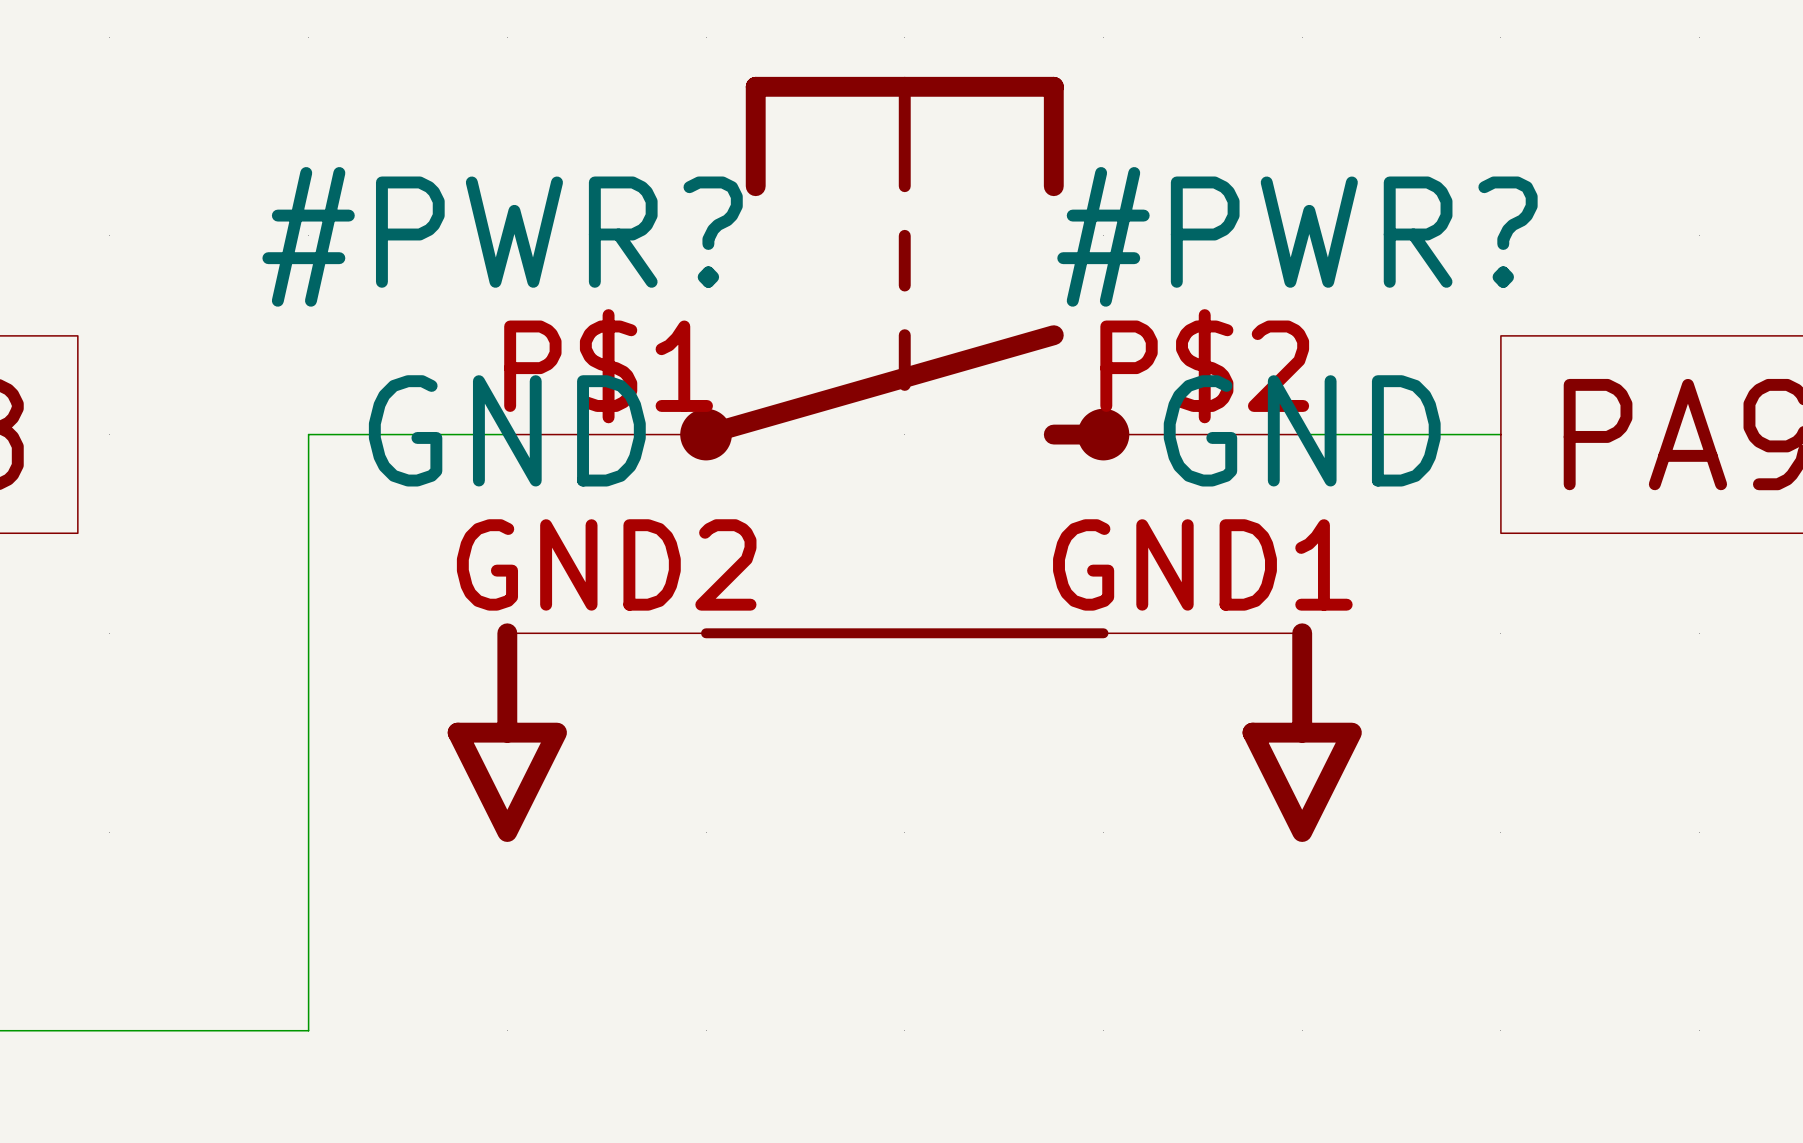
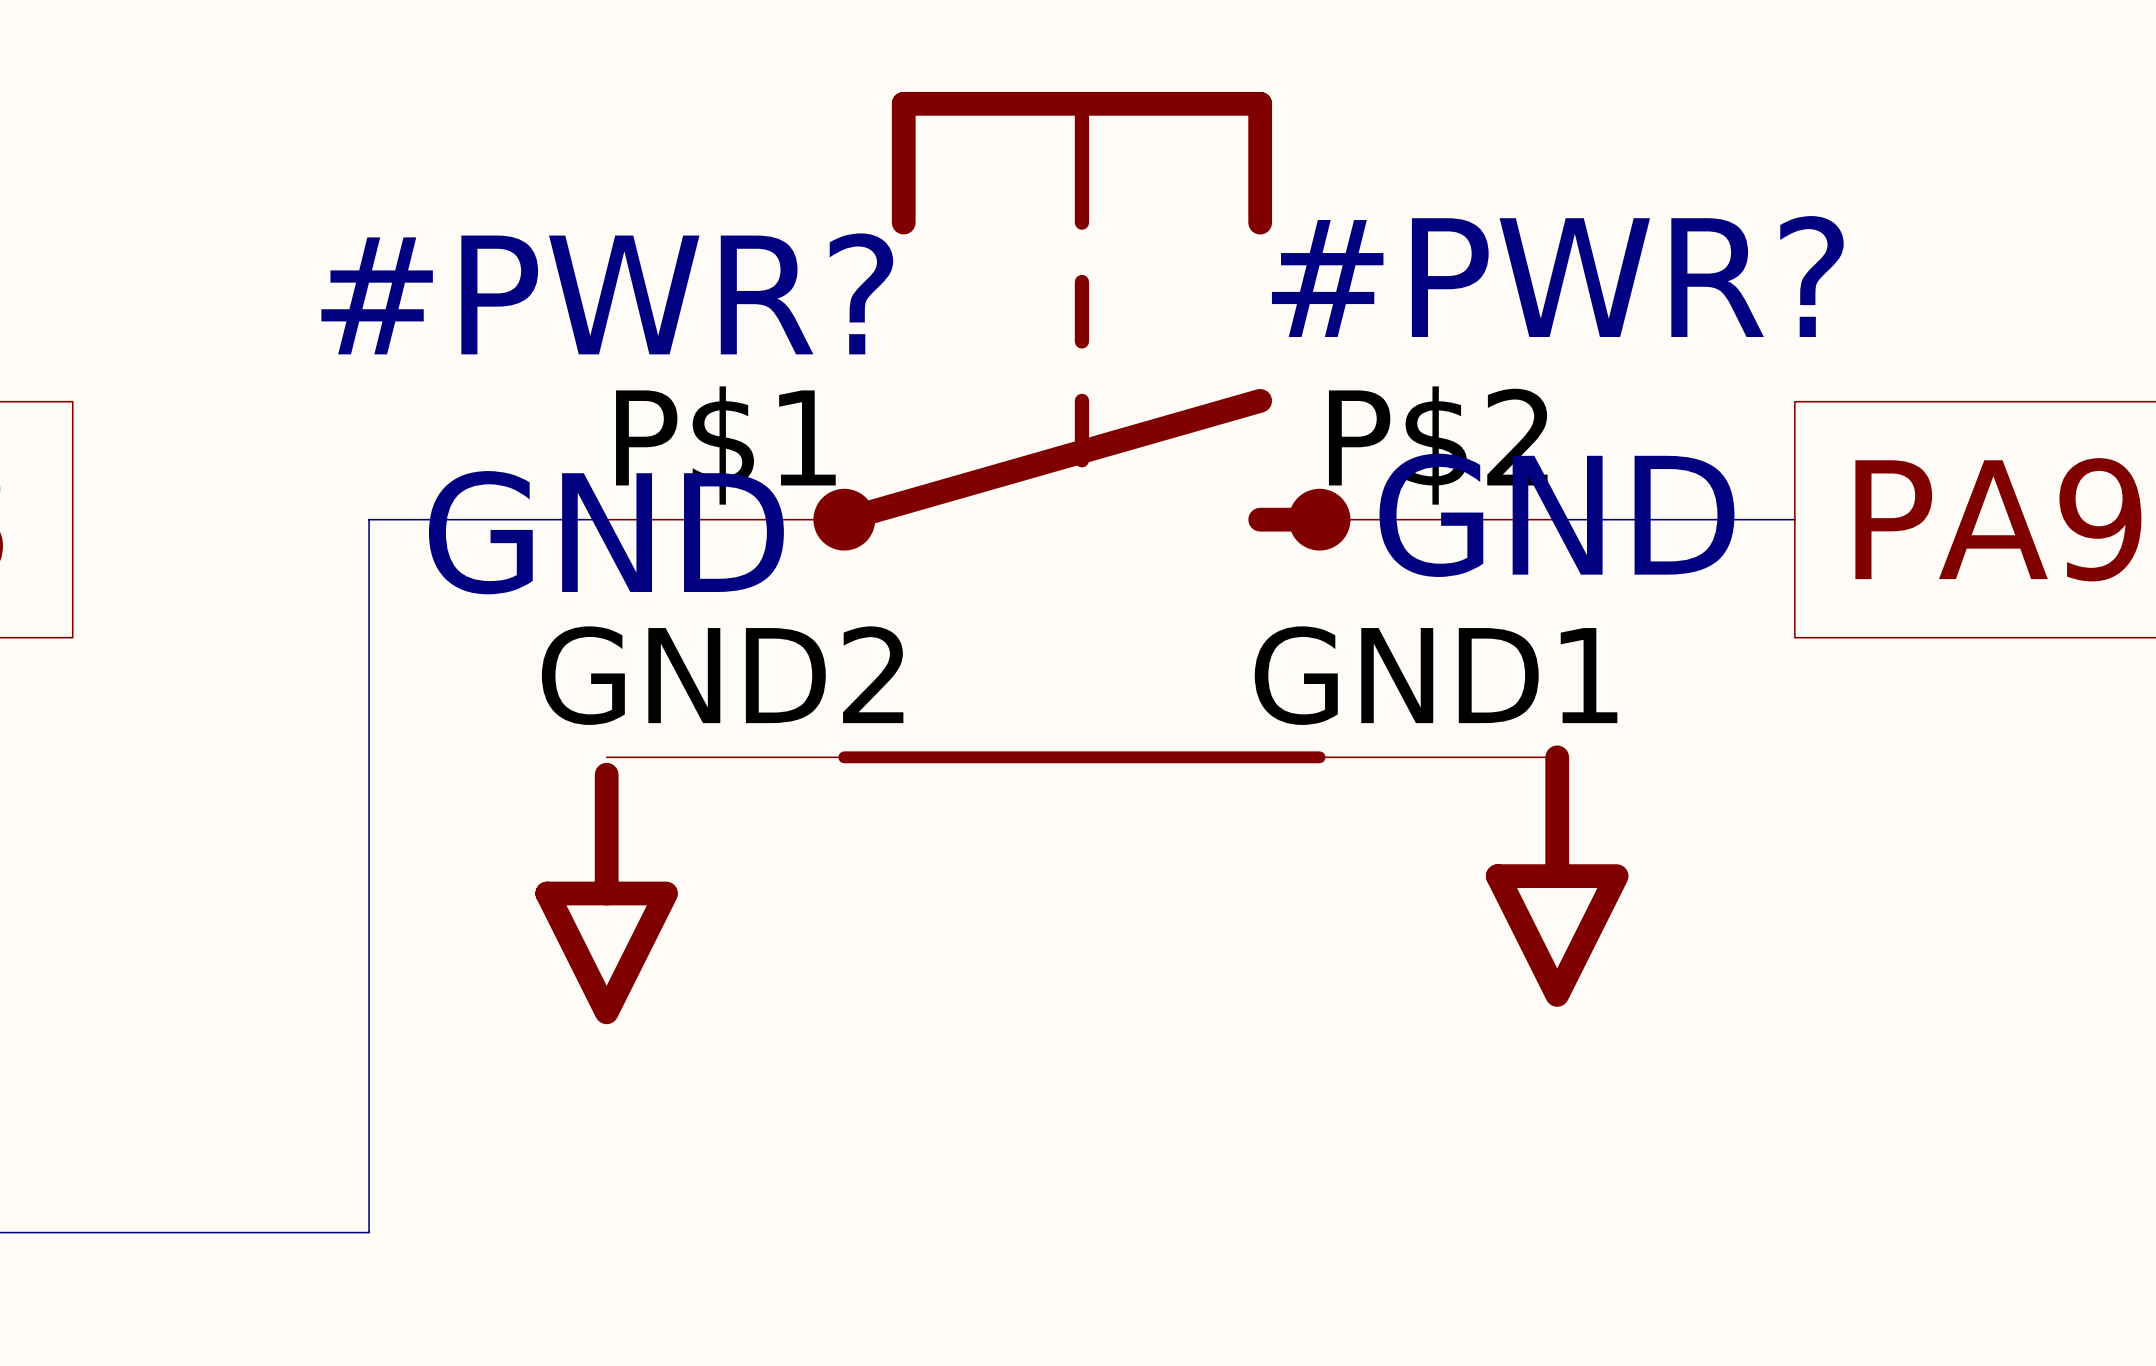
#PWR? position: GND (507, 732) -> GND (606, 893)

